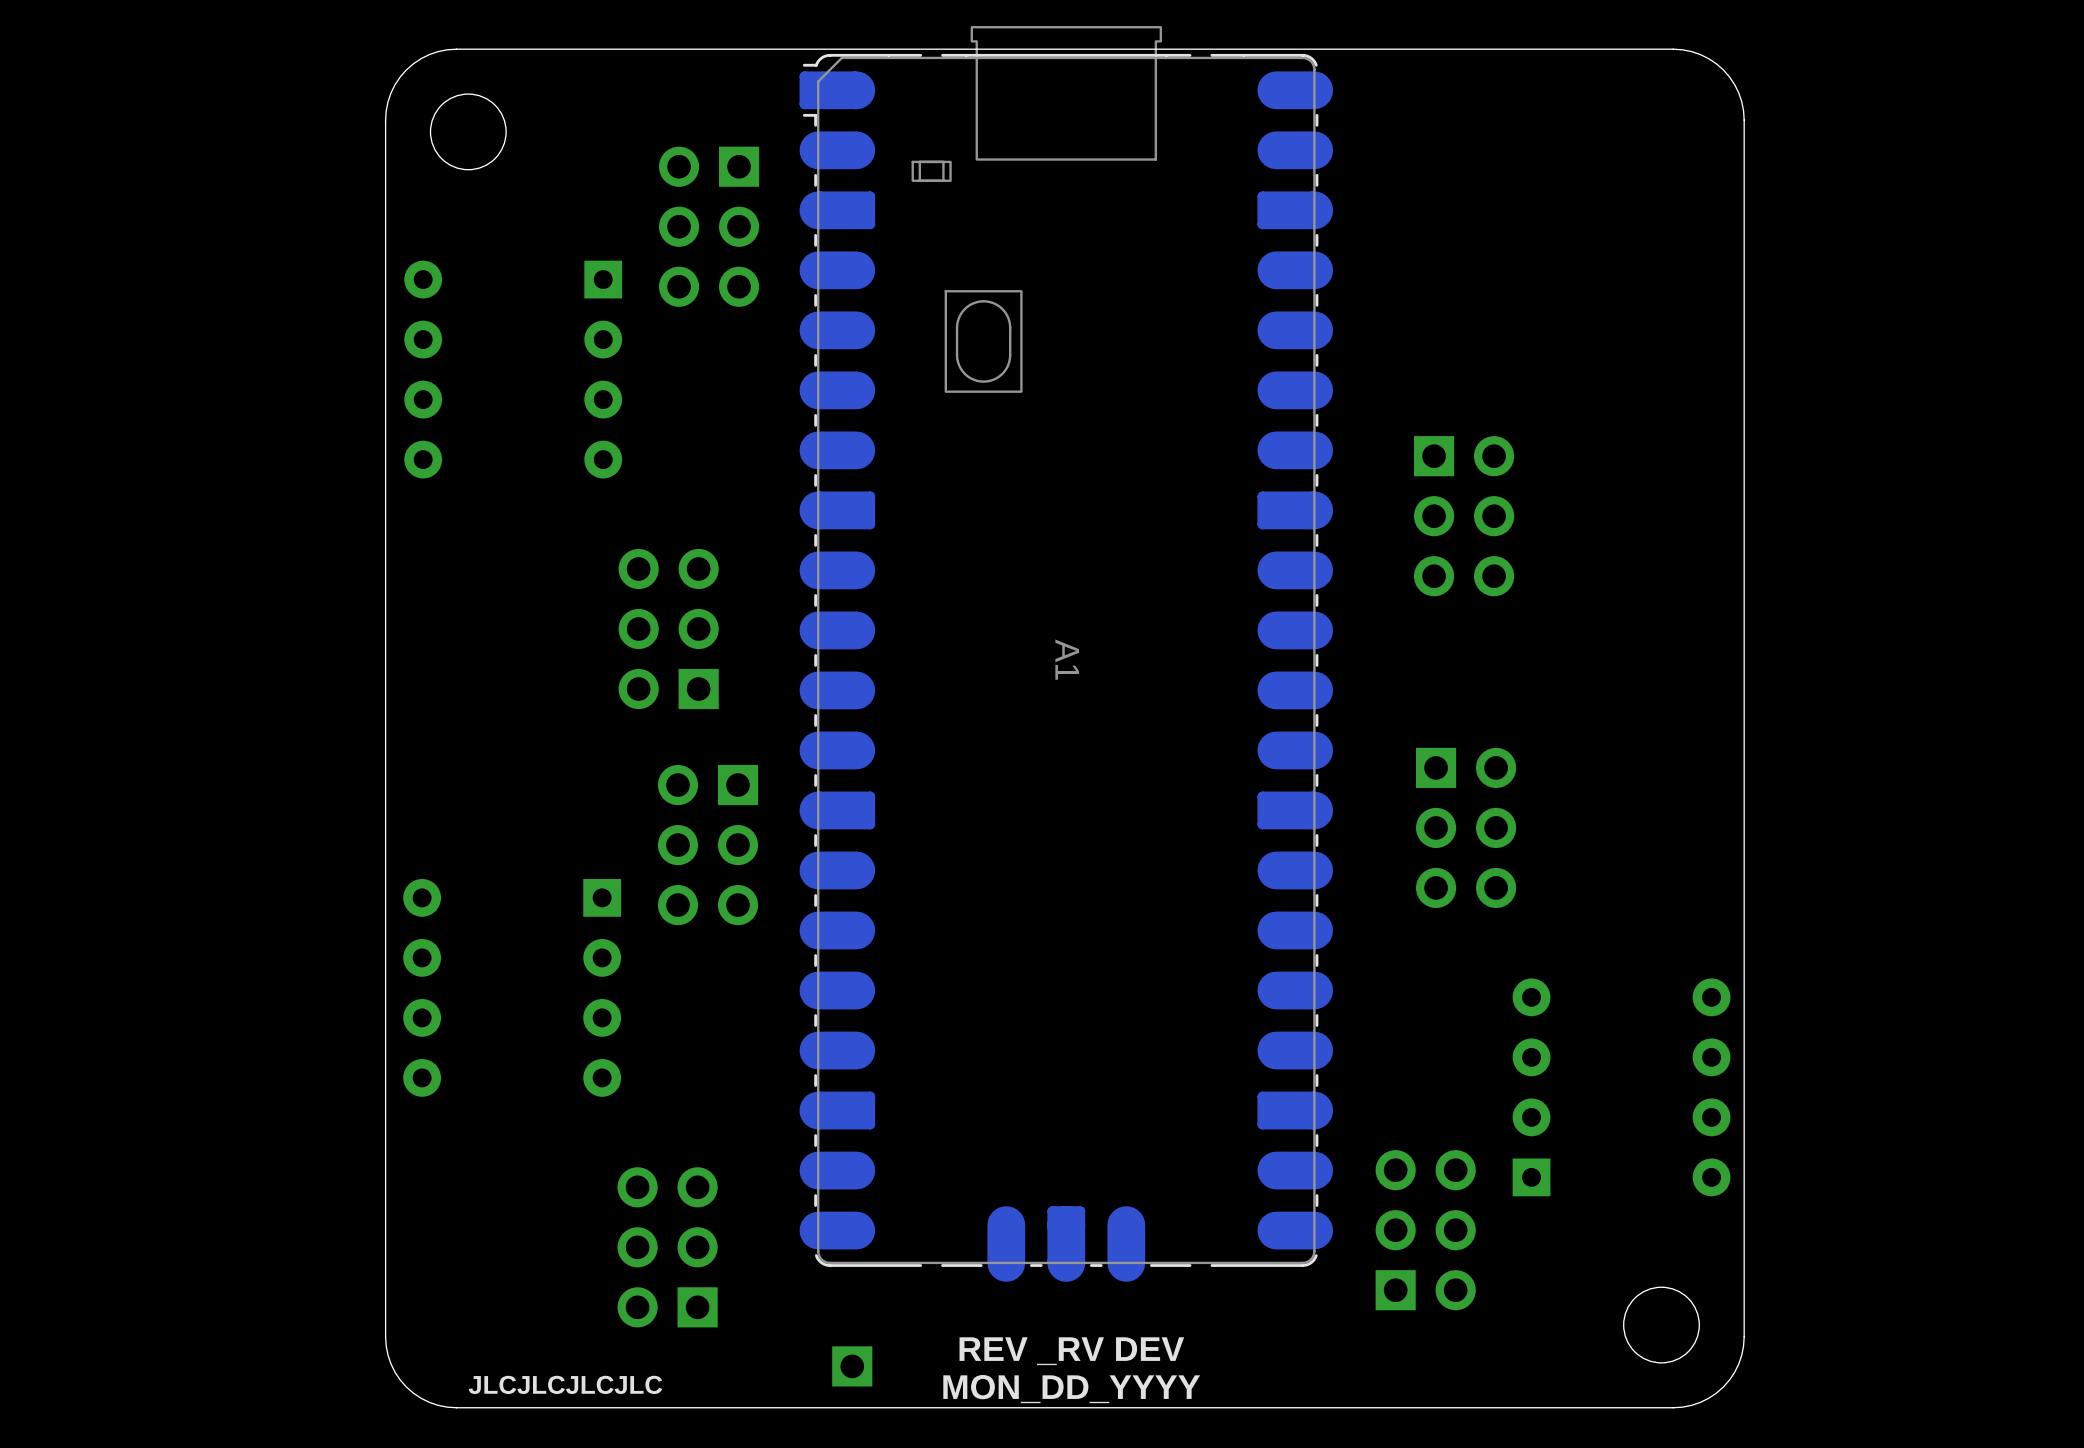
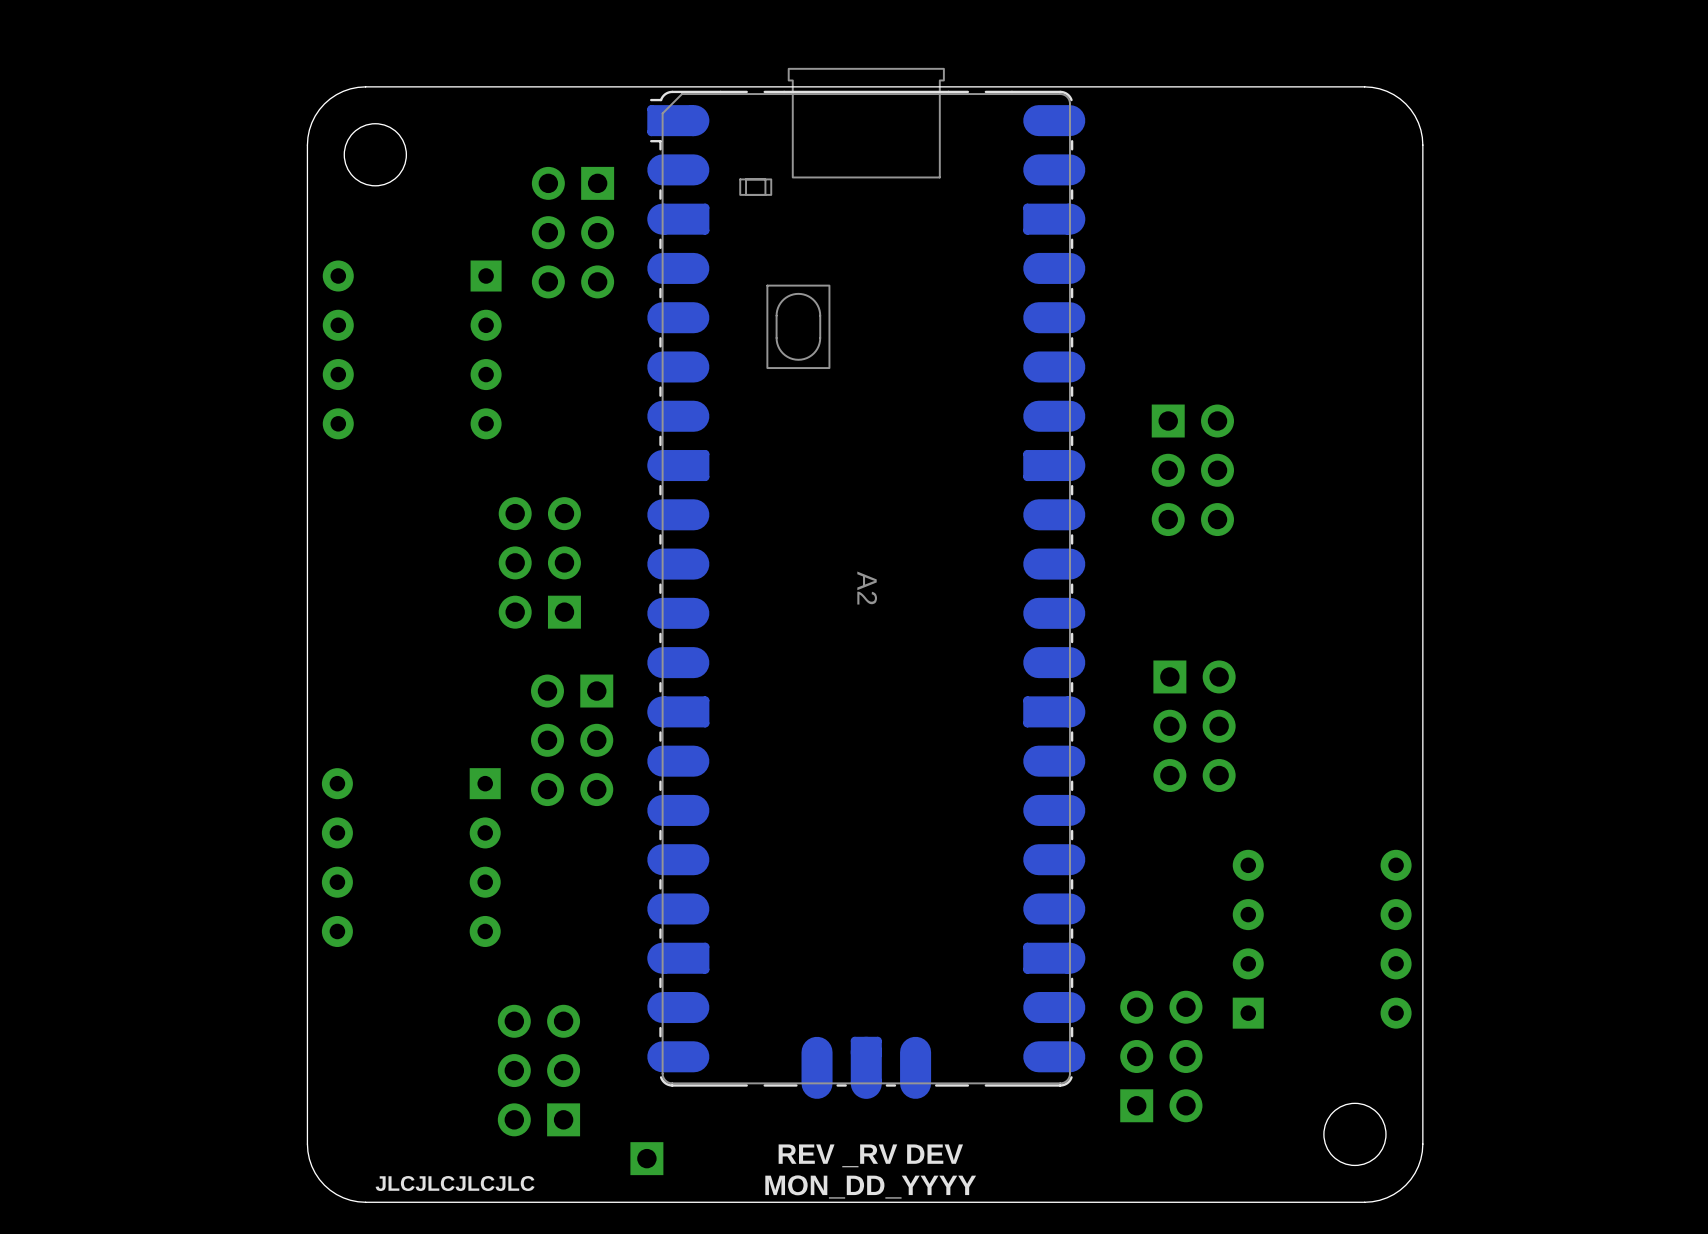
A1 name: A1 (1067, 659) -> A2 (867, 588)
part position: (852, 1366) -> (646, 1158)

